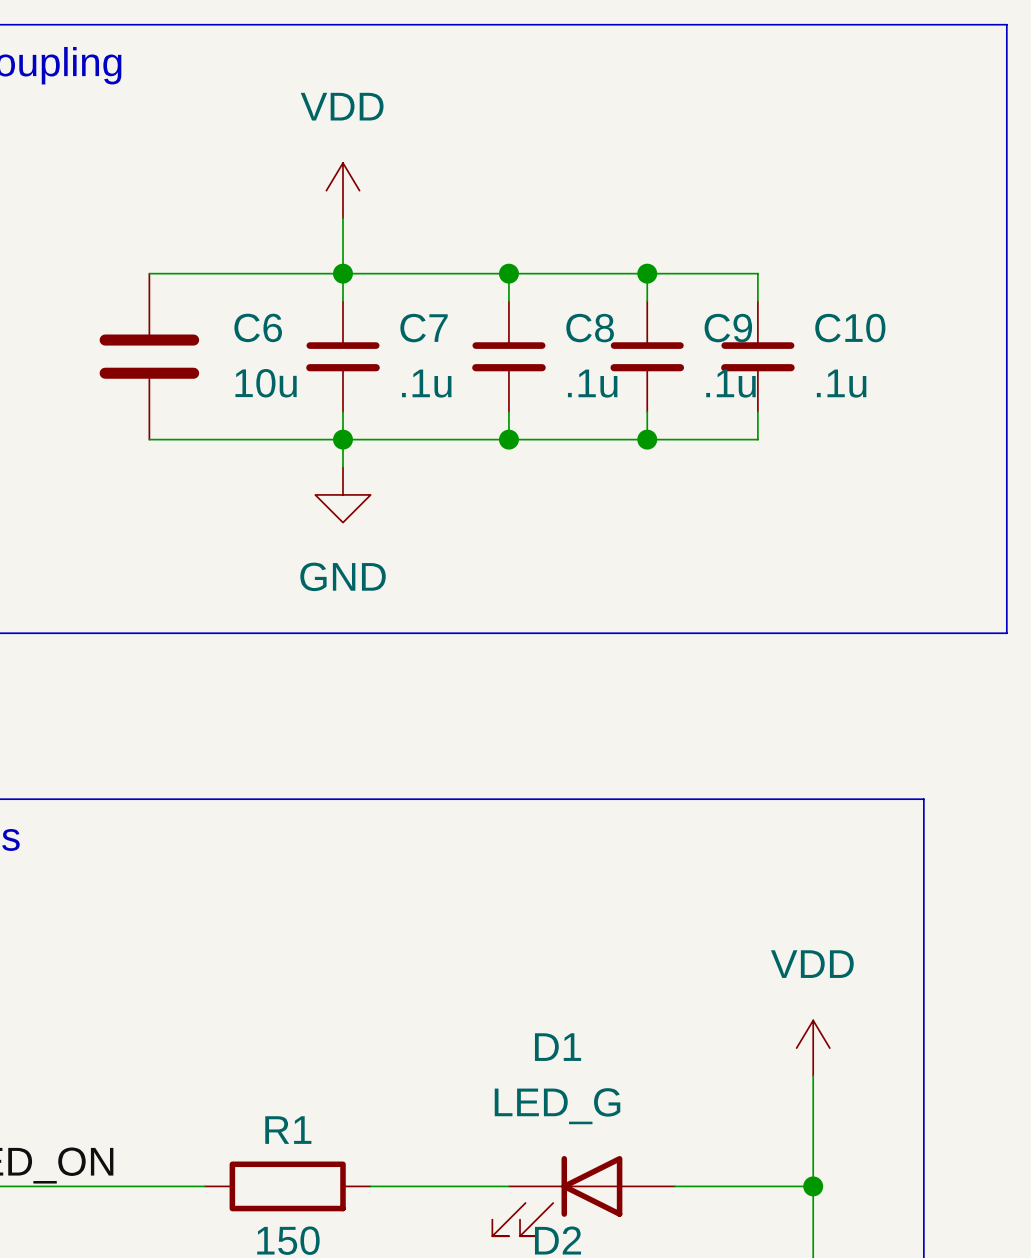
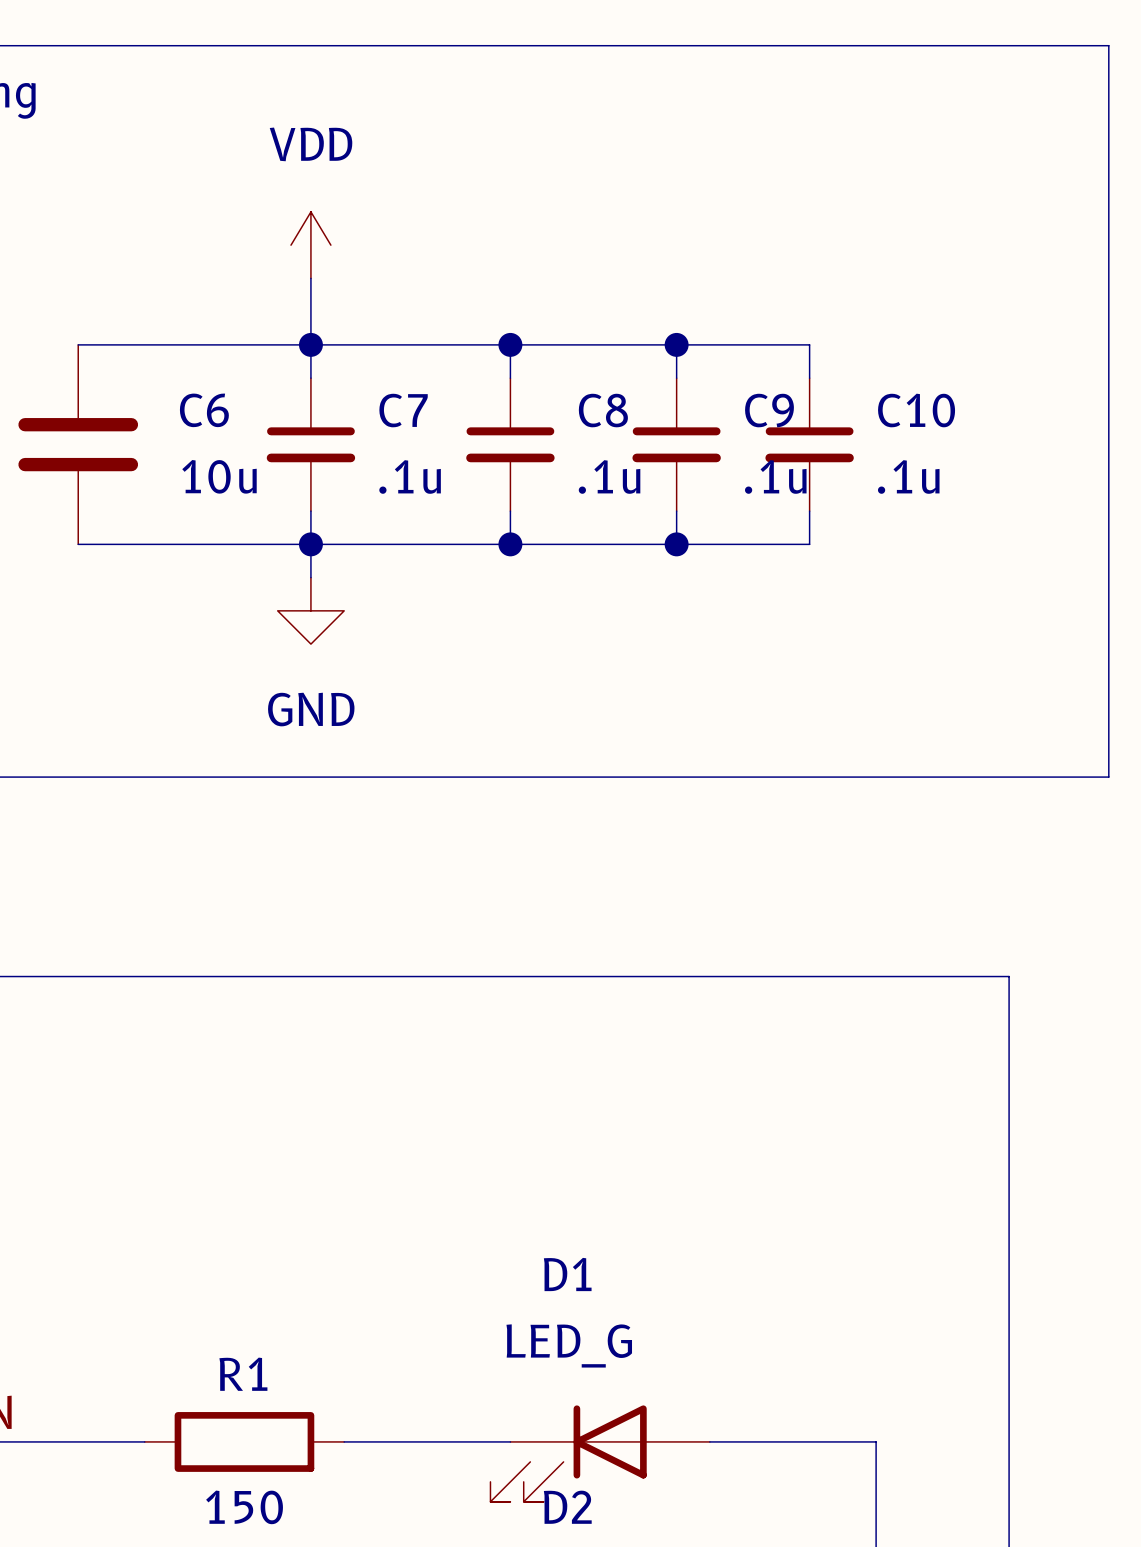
power symbol: VDD (813, 1048) -> none
wire: (813, 1075) (813, 1186) -> none
junction: (813, 1186) -> none

